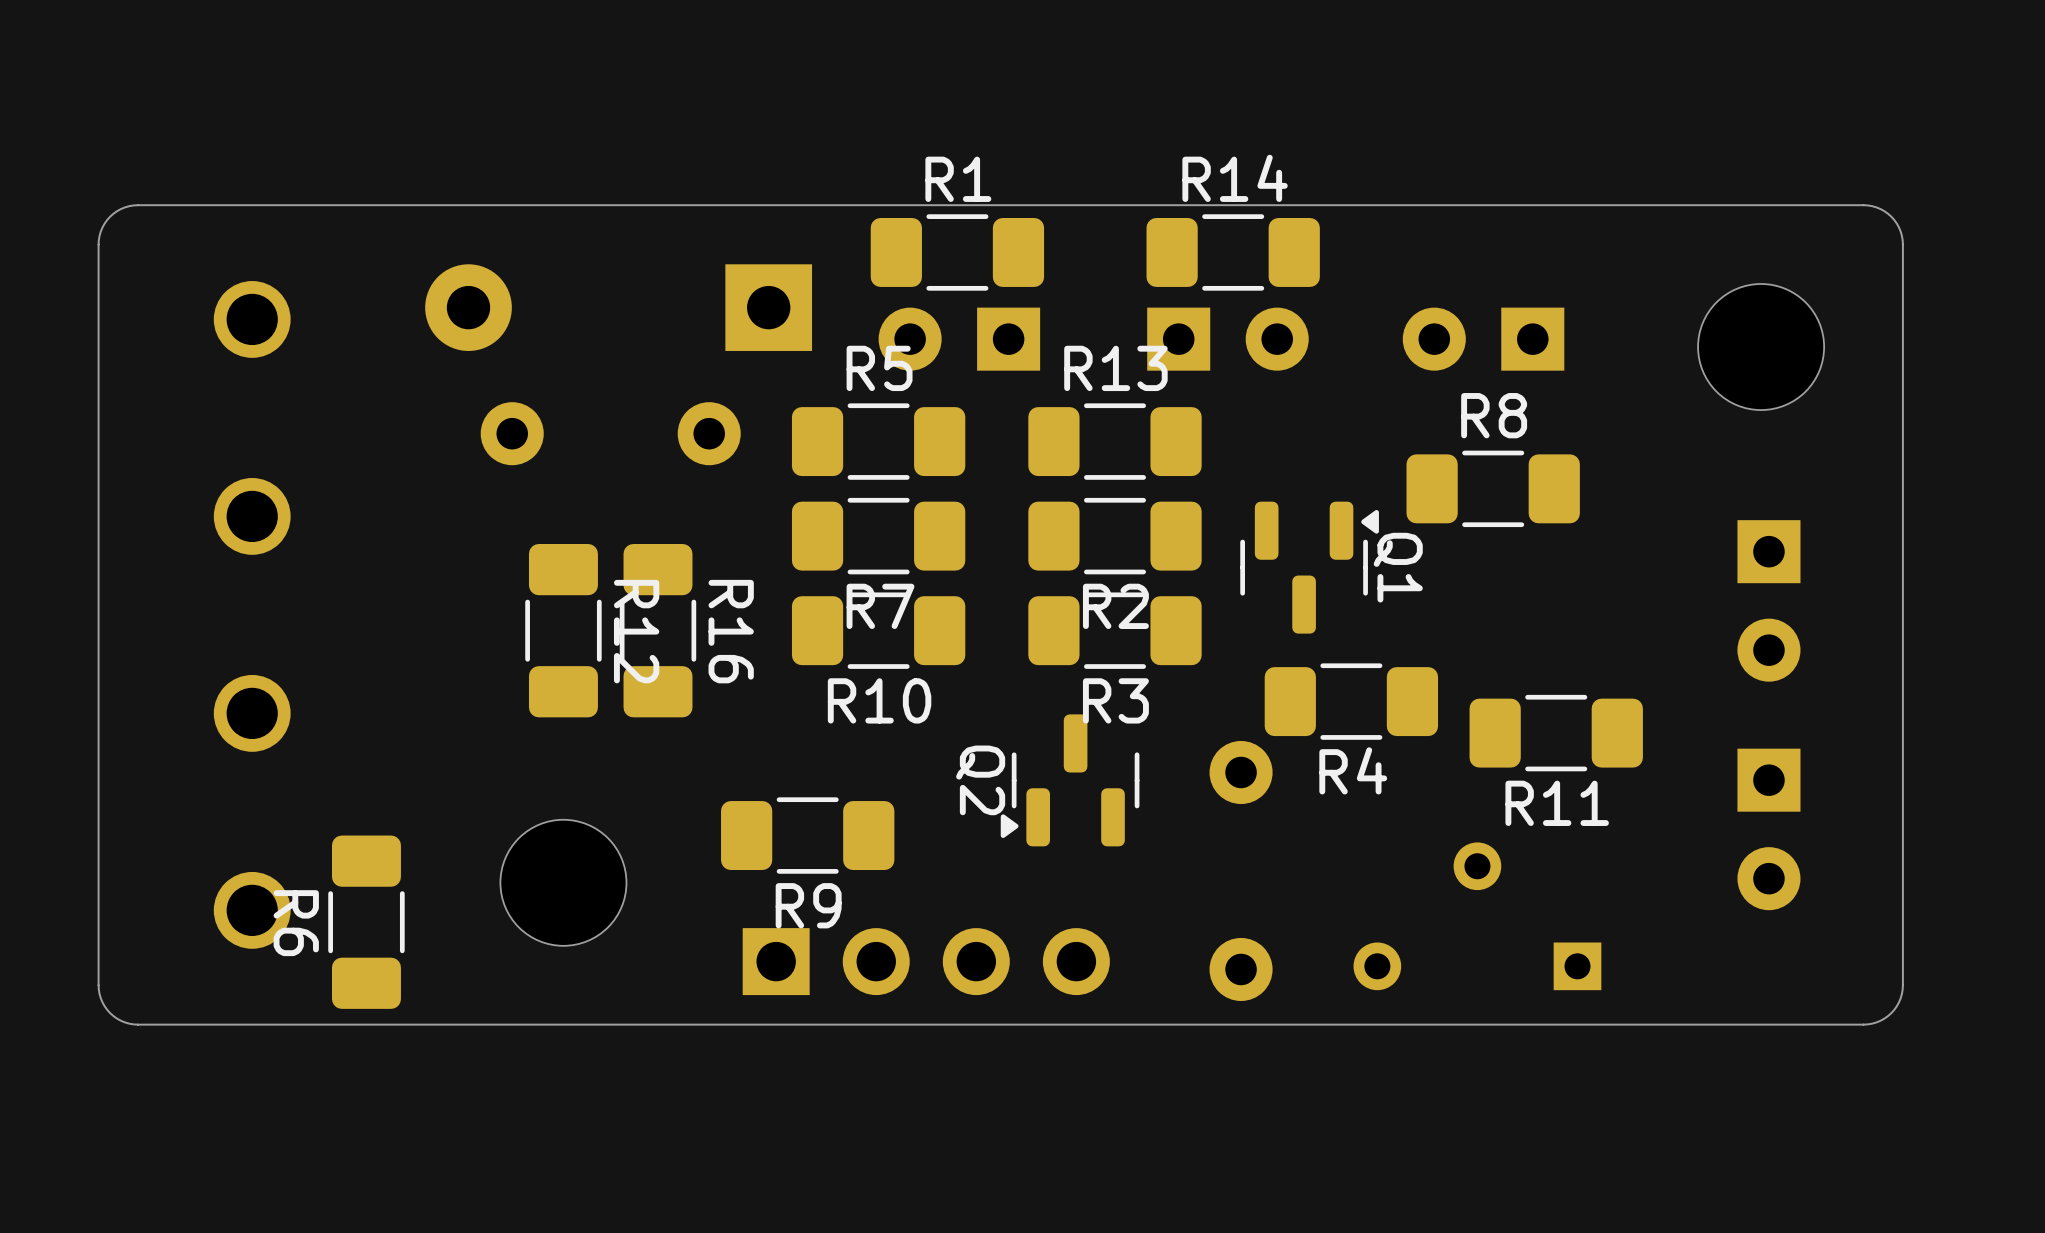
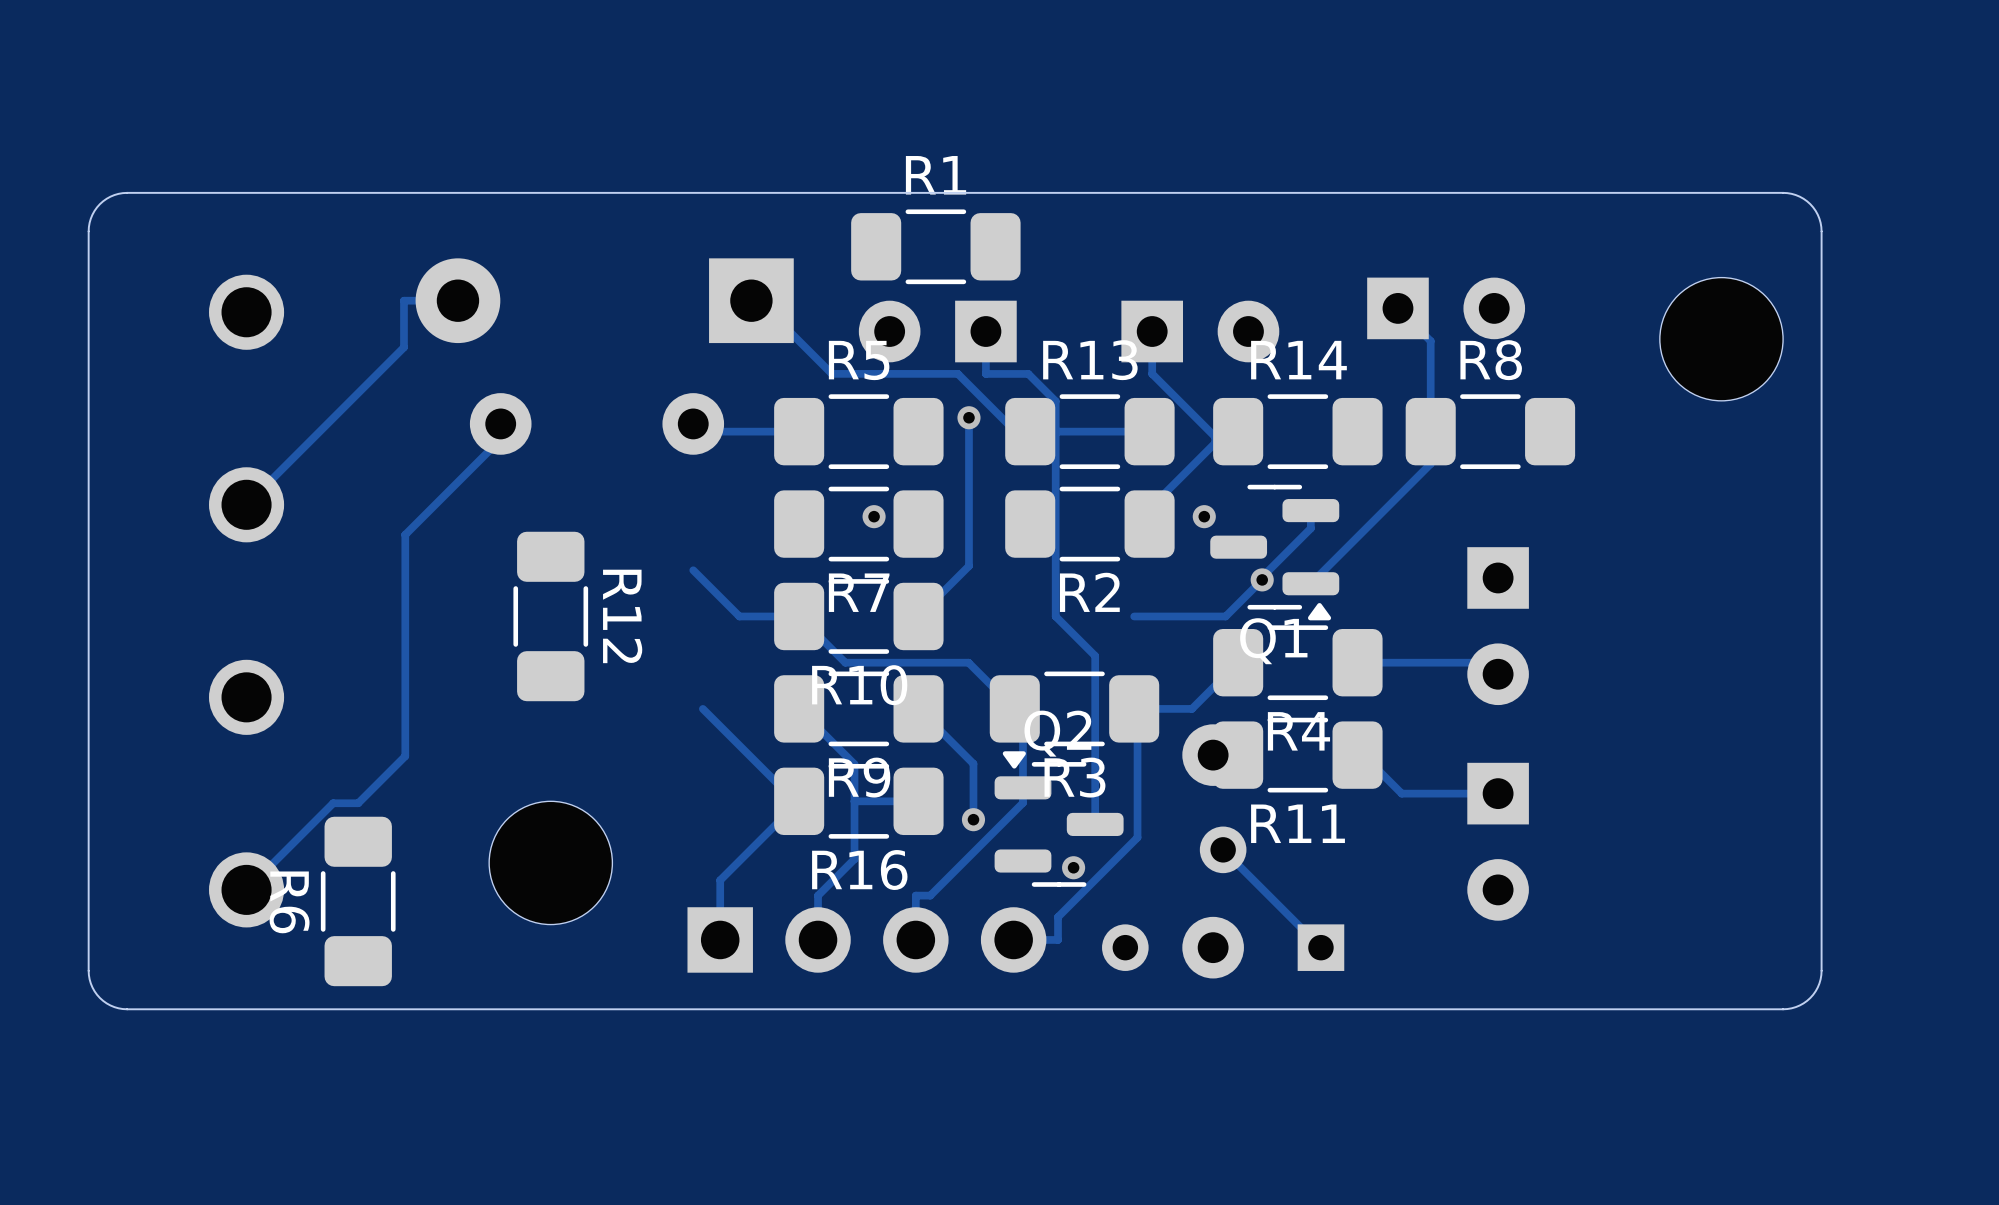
board edge: (1863, 205) (137, 205) (120, 209) (104, 223) (98, 244) (98, 985) (102, 1002) (117, 1018) (137, 1024) (1863, 1024) (1880, 1020) (1896, 1006) (1902, 985) (1902, 244) (1899, 227) (1891, 216) (1876, 207) (1863, 205) -> (1783, 192) (1795, 195) (1810, 204) (1817, 214) (1821, 231) (1821, 970) (1815, 991) (1799, 1005) (1783, 1009) (127, 1009) (106, 1003) (92, 987) (88, 970) (88, 231) (94, 210) (110, 196) (127, 192) (1783, 192)
R14 position: (1233, 252) -> (1297, 431)
track: none -> (457, 300) (403, 300) (403, 347) (246, 504)
track: none -> (751, 300) (758, 300) (831, 373) (957, 373) (1014, 431)
track: none -> (1397, 308) (1430, 341) (1430, 463) (1310, 583)
track: none -> (985, 331) (985, 373) (1028, 373) (1055, 401) (1055, 616) (1095, 655) (1095, 824)
track: none -> (1152, 331) (1152, 373) (1215, 436)
part rotation: 0° (1483, 339) -> 180° (1446, 308)
track: none -> (968, 417) (968, 566) (918, 616)
via: none -> (968, 417)
track: none -> (799, 431) (700, 431) (693, 439)
track: none -> (1134, 431) (1055, 431)
track: none -> (1215, 436) (1215, 443) (1134, 524)
track: none -> (500, 439) (405, 534) (405, 756) (358, 803) (333, 803) (246, 889)
R8 position: (1493, 488) -> (1490, 431)
track: none -> (1310, 510) (1310, 528) (1225, 616) (1134, 616)
via: none -> (874, 516)
via: none -> (1204, 516)
Q1 rotation: 0° (1309, 567) -> 90° clockwise (1274, 552)
track: none -> (693, 570) (739, 616) (799, 616) (845, 662) (968, 662) (1022, 717) (1022, 802) (930, 895) (915, 895) (915, 939)
via: none -> (1262, 579)
part: (1768, 600) -> none
R16 rotation: 0° (658, 630) -> 90° clockwise (858, 801)
R16 position: (658, 630) -> (858, 801)
R3 position: (1114, 630) -> (1074, 708)
part: none -> (1498, 626)
track: none -> (1238, 662) (1191, 708) (1134, 708) (1137, 712) (1137, 837) (1058, 917) (1058, 939) (1013, 939)
track: none -> (1357, 662) (1486, 662) (1498, 674)
R4 position: (1351, 701) -> (1297, 662)
track: none -> (702, 708) (797, 803)
track: none -> (799, 708) (854, 764) (854, 859) (818, 895) (818, 939)
track: none -> (918, 708) (973, 763) (973, 819)
R11 position: (1556, 733) -> (1297, 755)
track: none -> (1357, 755) (1363, 755) (1401, 793) (1498, 793)
Q2 rotation: 0° (1070, 780) -> 90° clockwise (1059, 819)
track: none -> (799, 801) (720, 880) (720, 939)
track: none -> (918, 801) (854, 801)
part: (1768, 829) -> none
R9 position: (807, 835) -> (858, 708)
via: none -> (973, 819)
part: none -> (1498, 841)
track: none -> (1223, 849) (1320, 947)
via: none -> (1073, 867)
part position: (1477, 916) -> (1223, 898)
part position: (926, 961) -> (866, 939)

